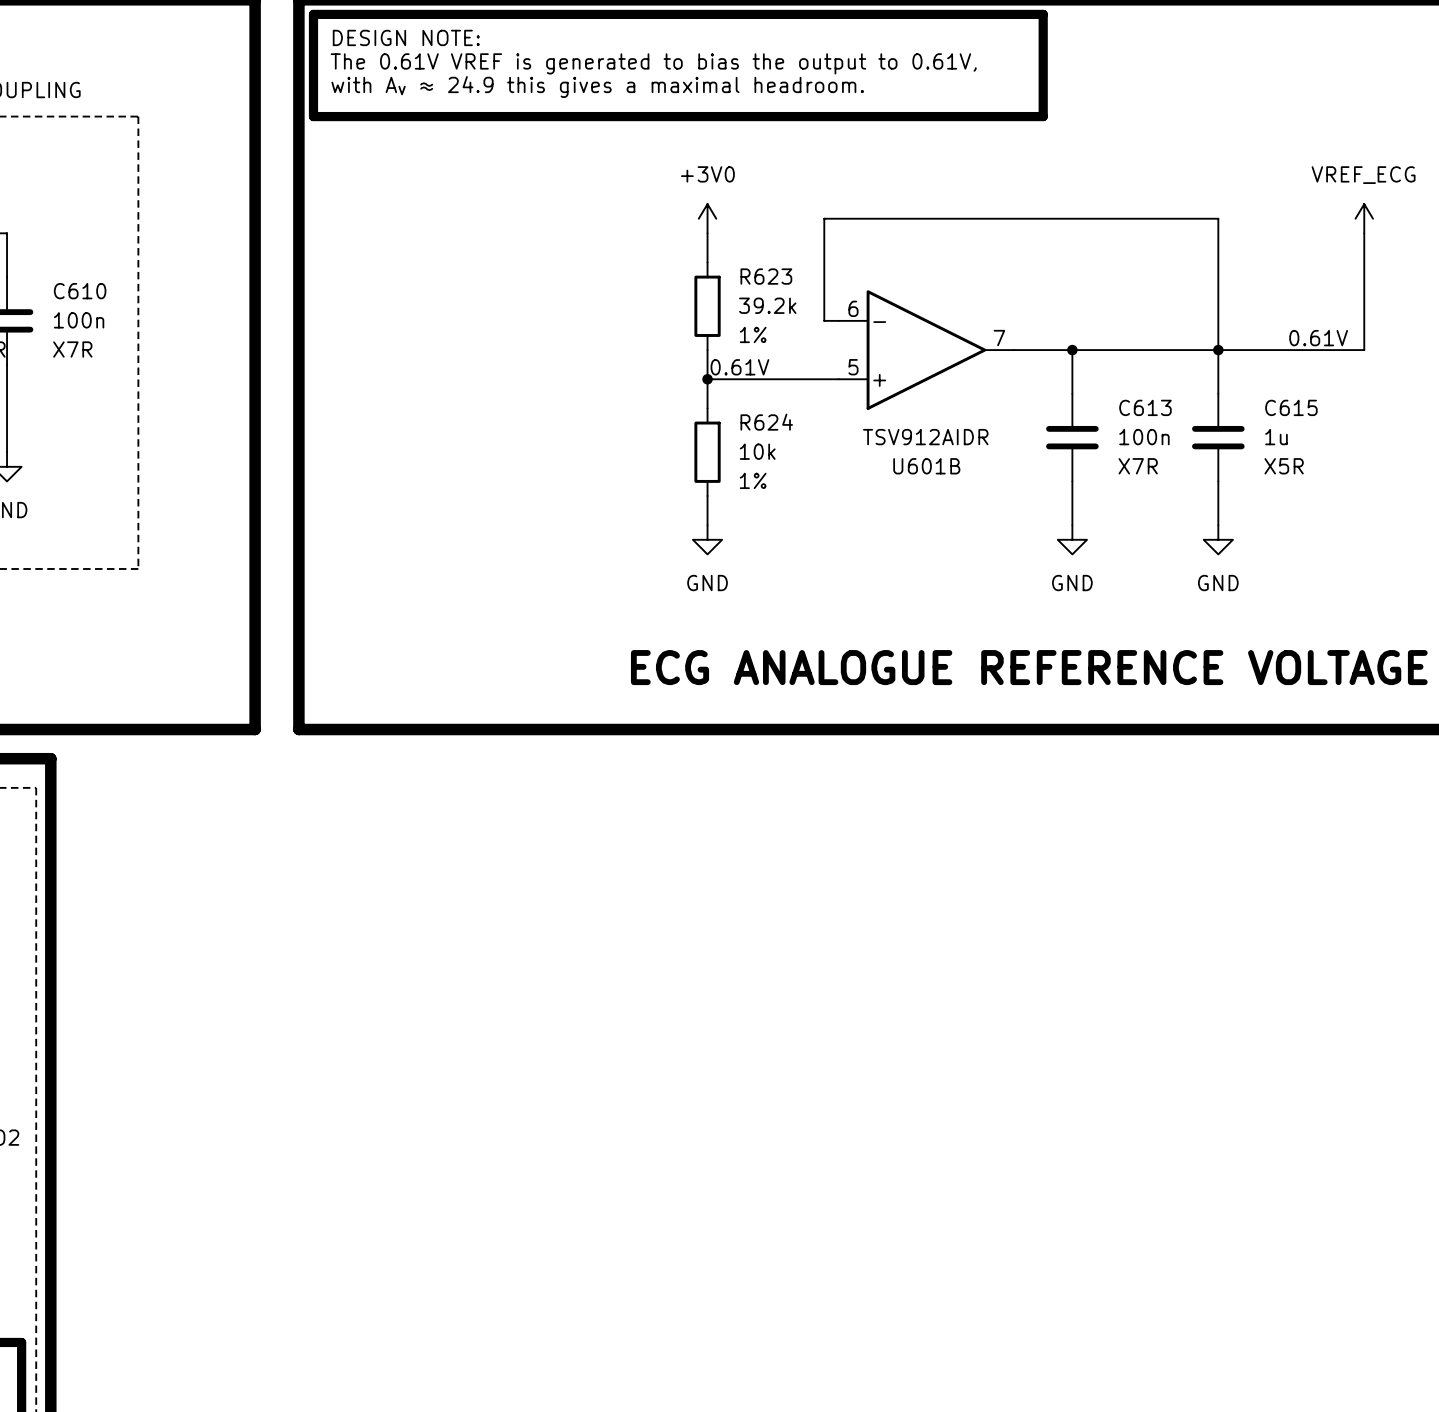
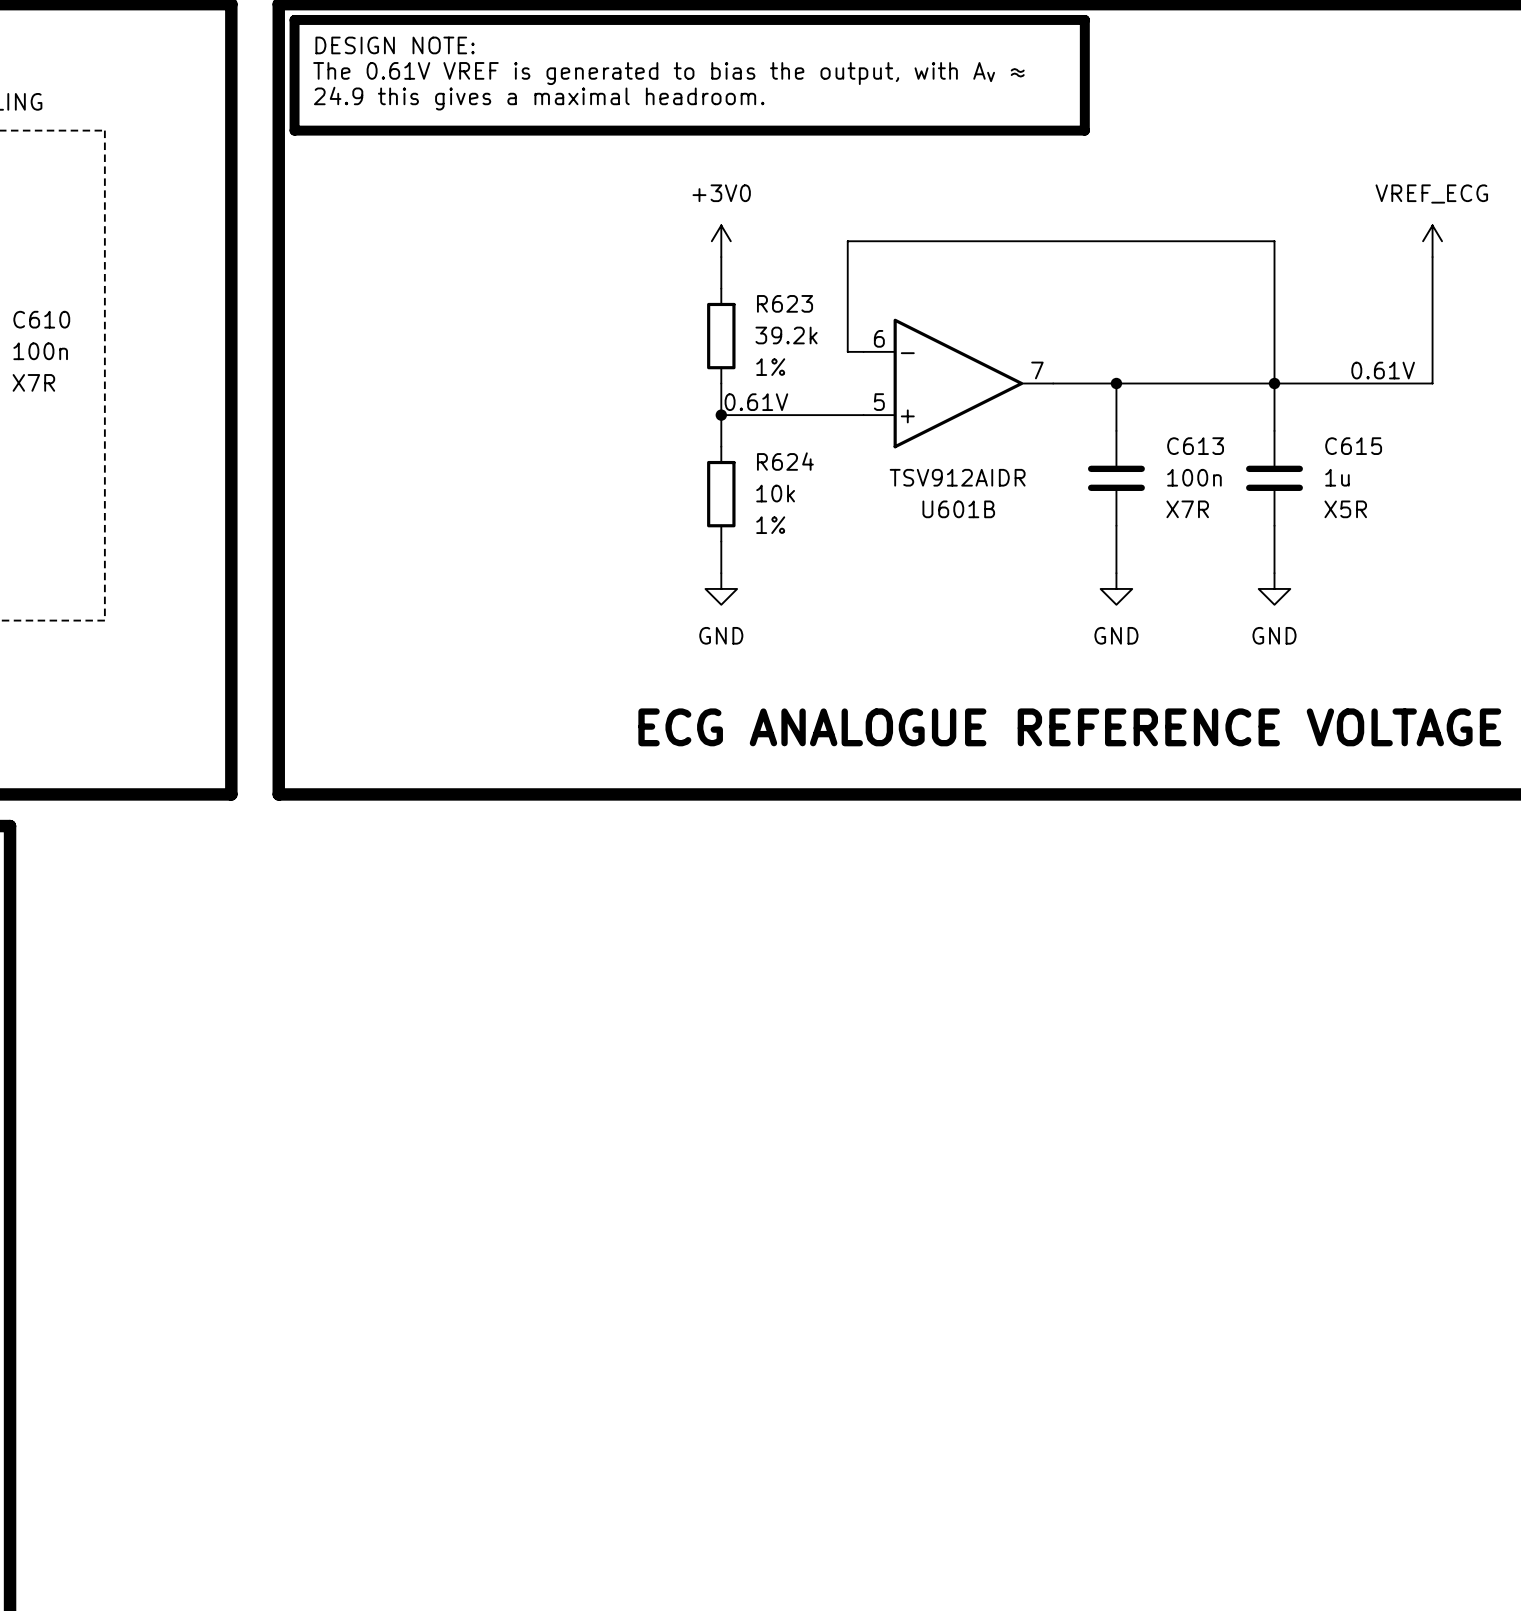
text: The 0.61V VREF is generated to bias the output to 0.61V, (653, 63) -> The 0.61V VREF is generated to bias the output, with Av ≈ (668, 73)
text: with Av ≈ 24.9 this gives a maximal headroom. (597, 87) -> 24.9 this gives a maximal headroom. (539, 98)

